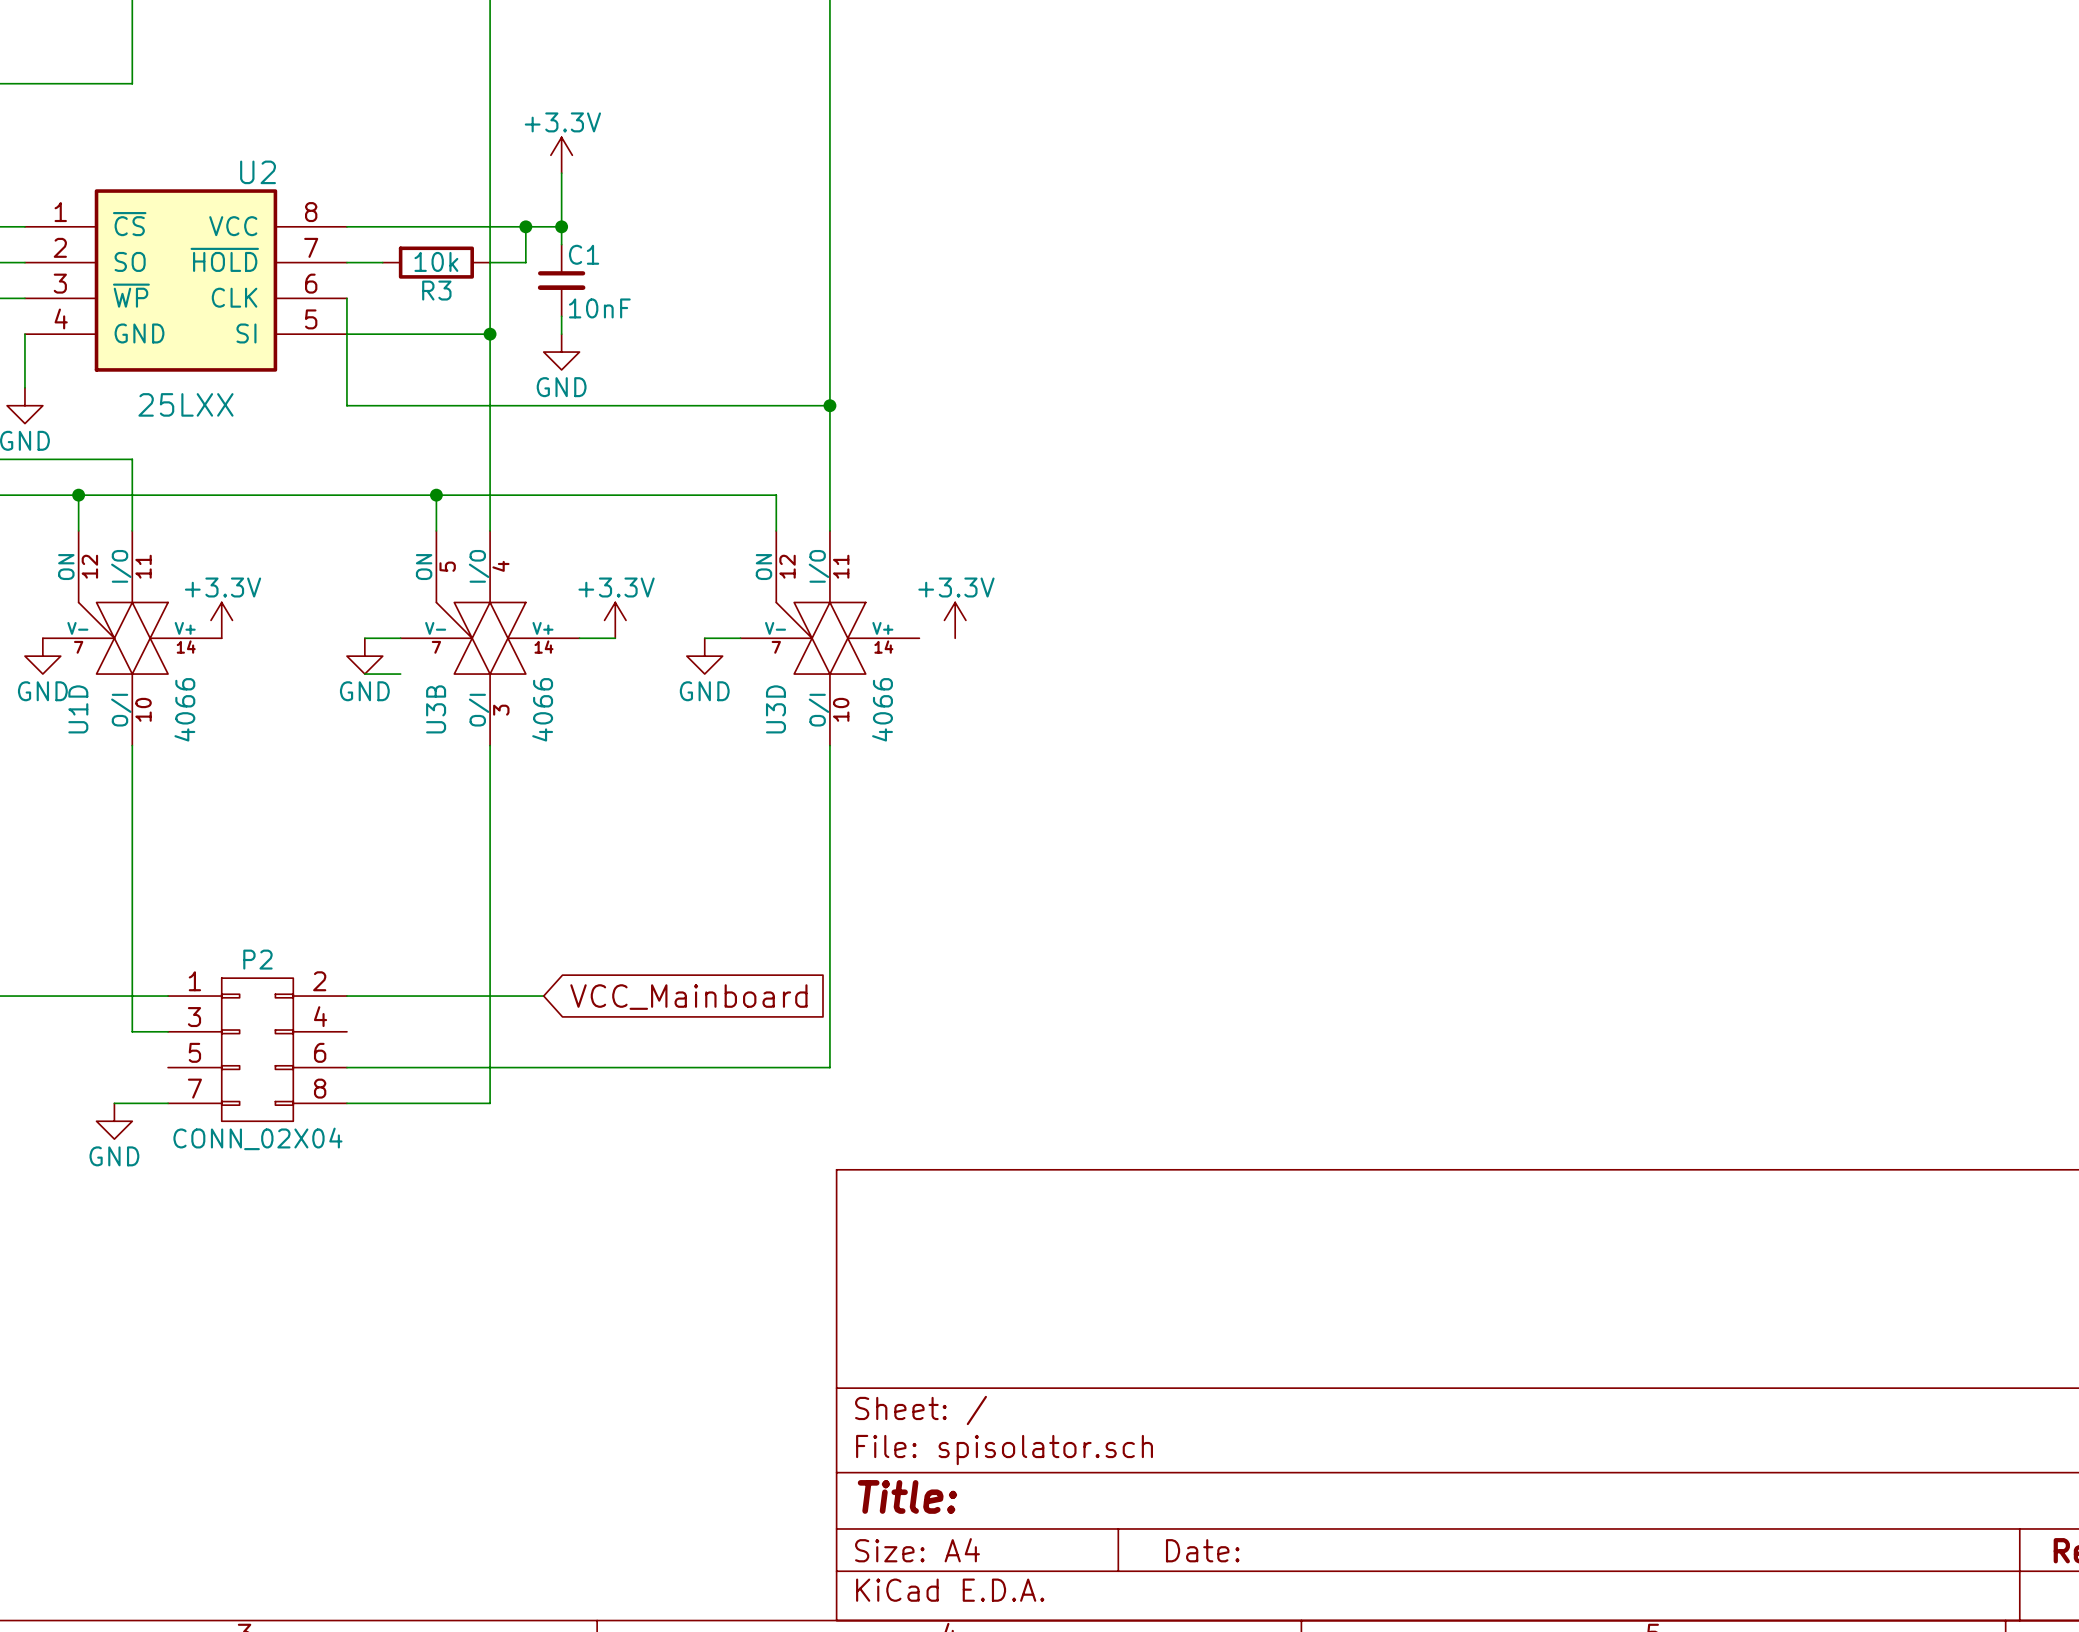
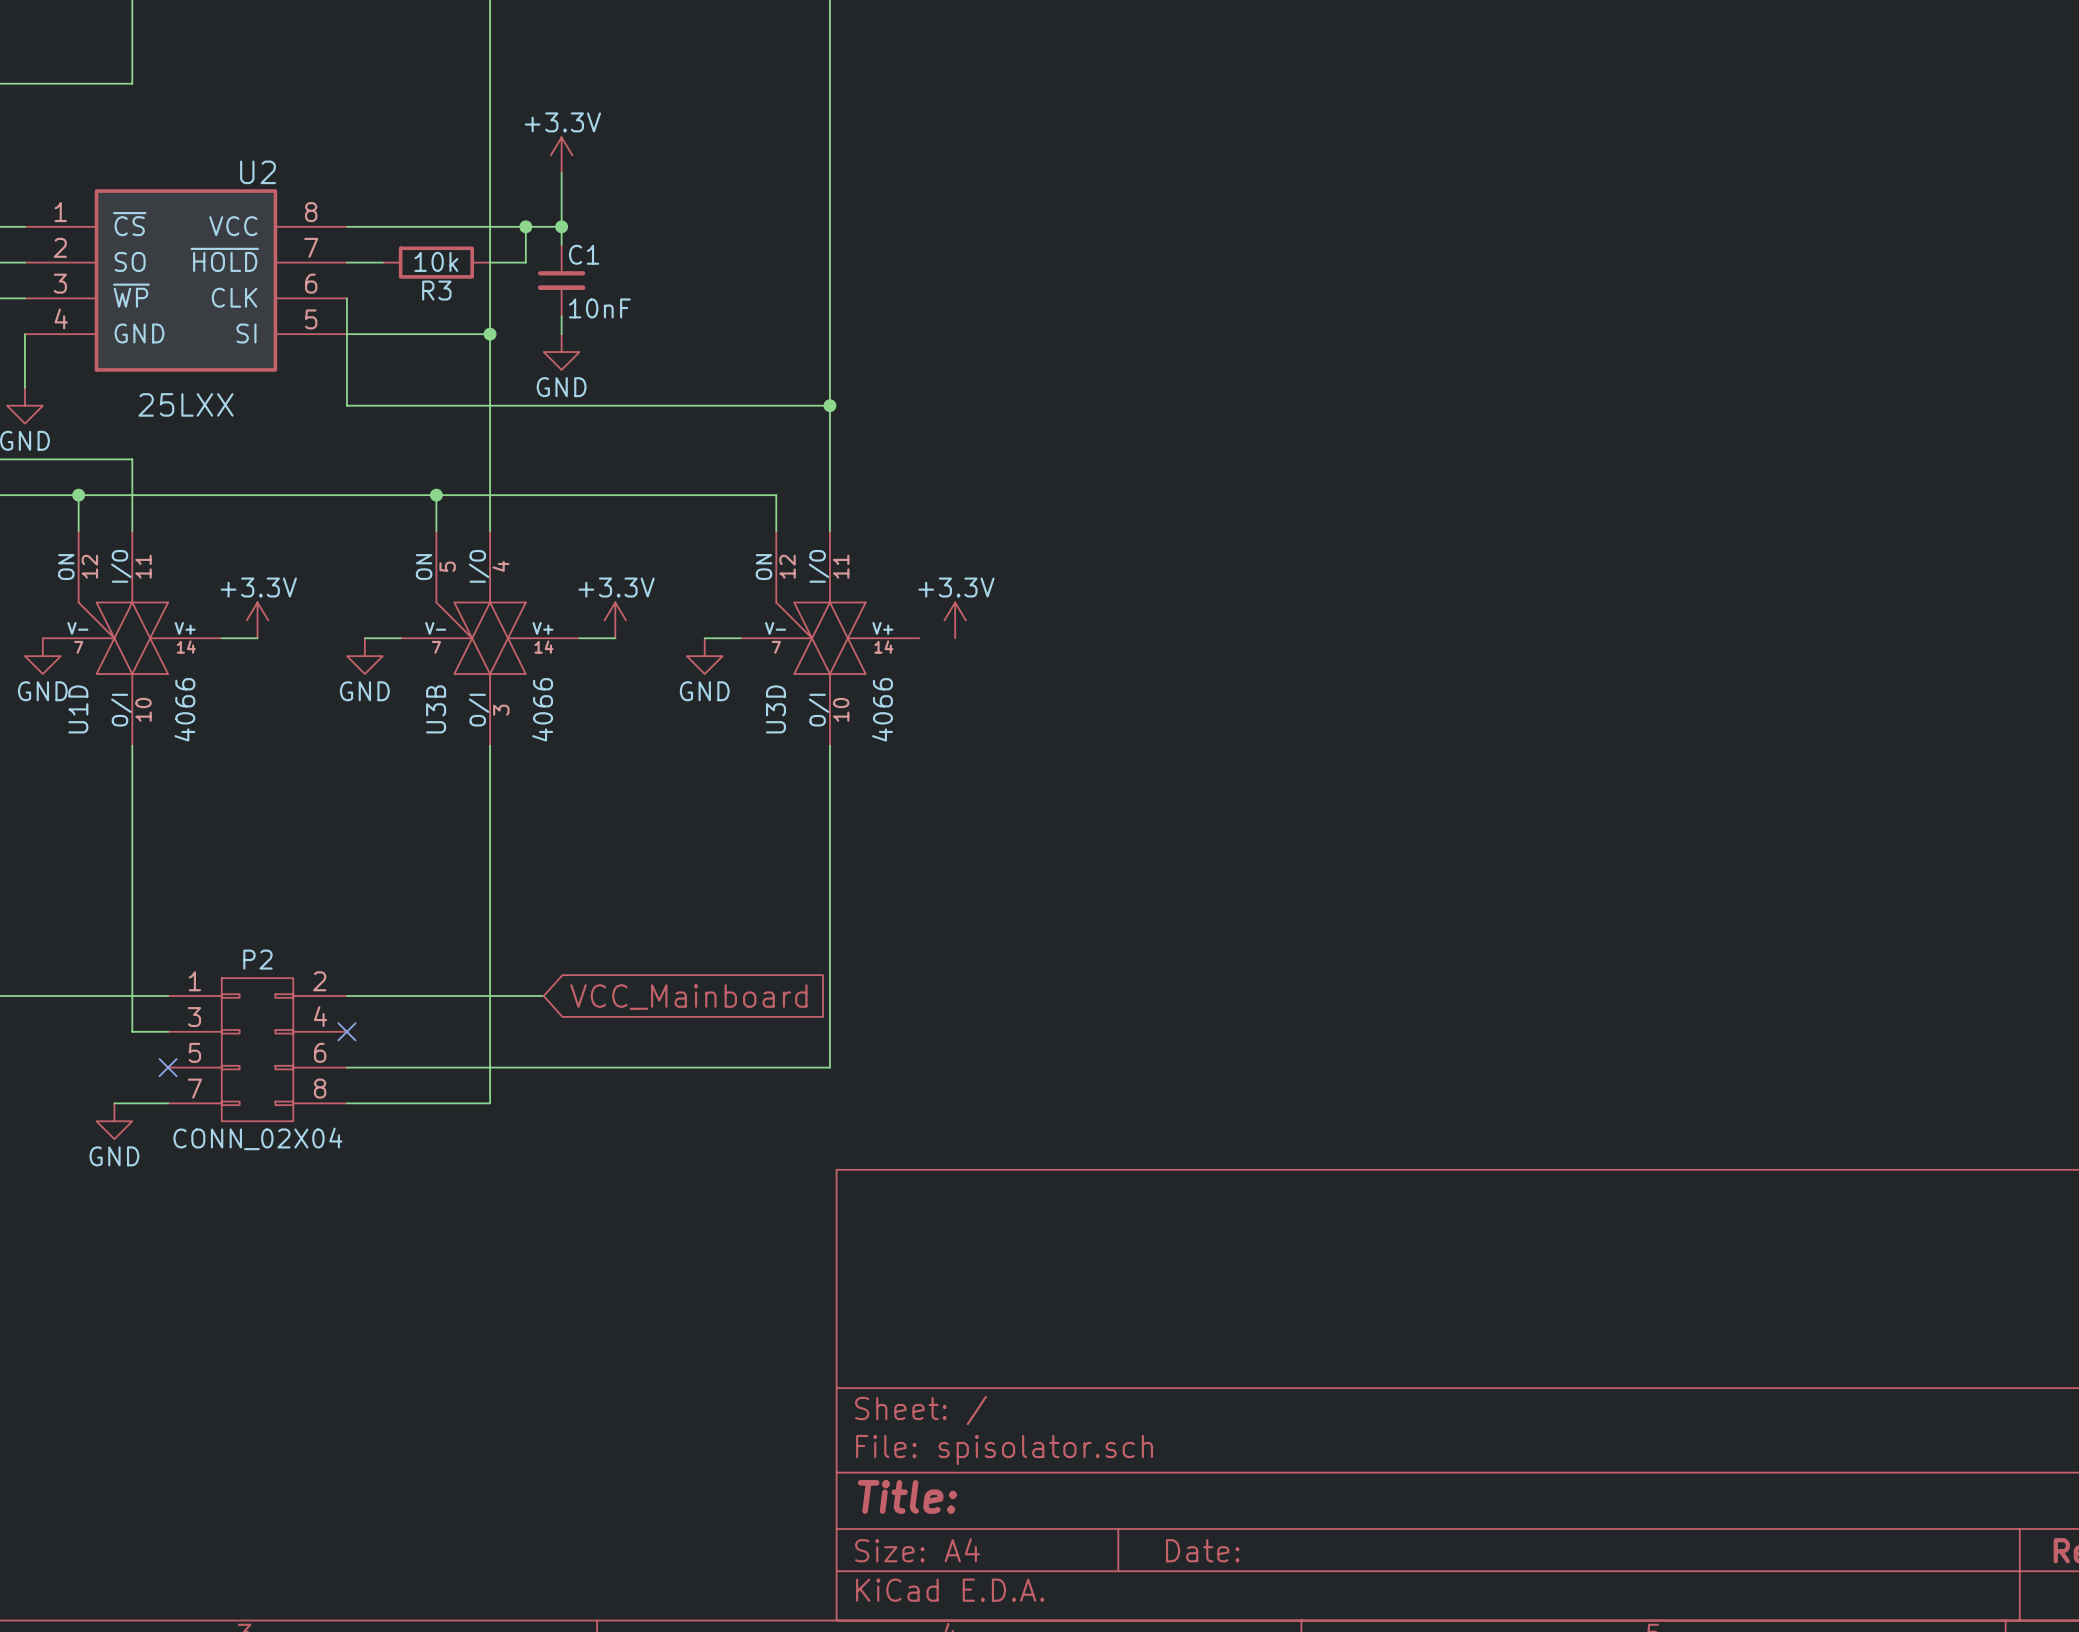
power symbol position: +3.3V (221, 620) -> +3.3V (257, 620)
wire: (364, 674) (400, 674) -> (221, 638) (257, 638)
no-connect mark: none -> (346, 1031)
no-connect mark: none -> (168, 1067)

